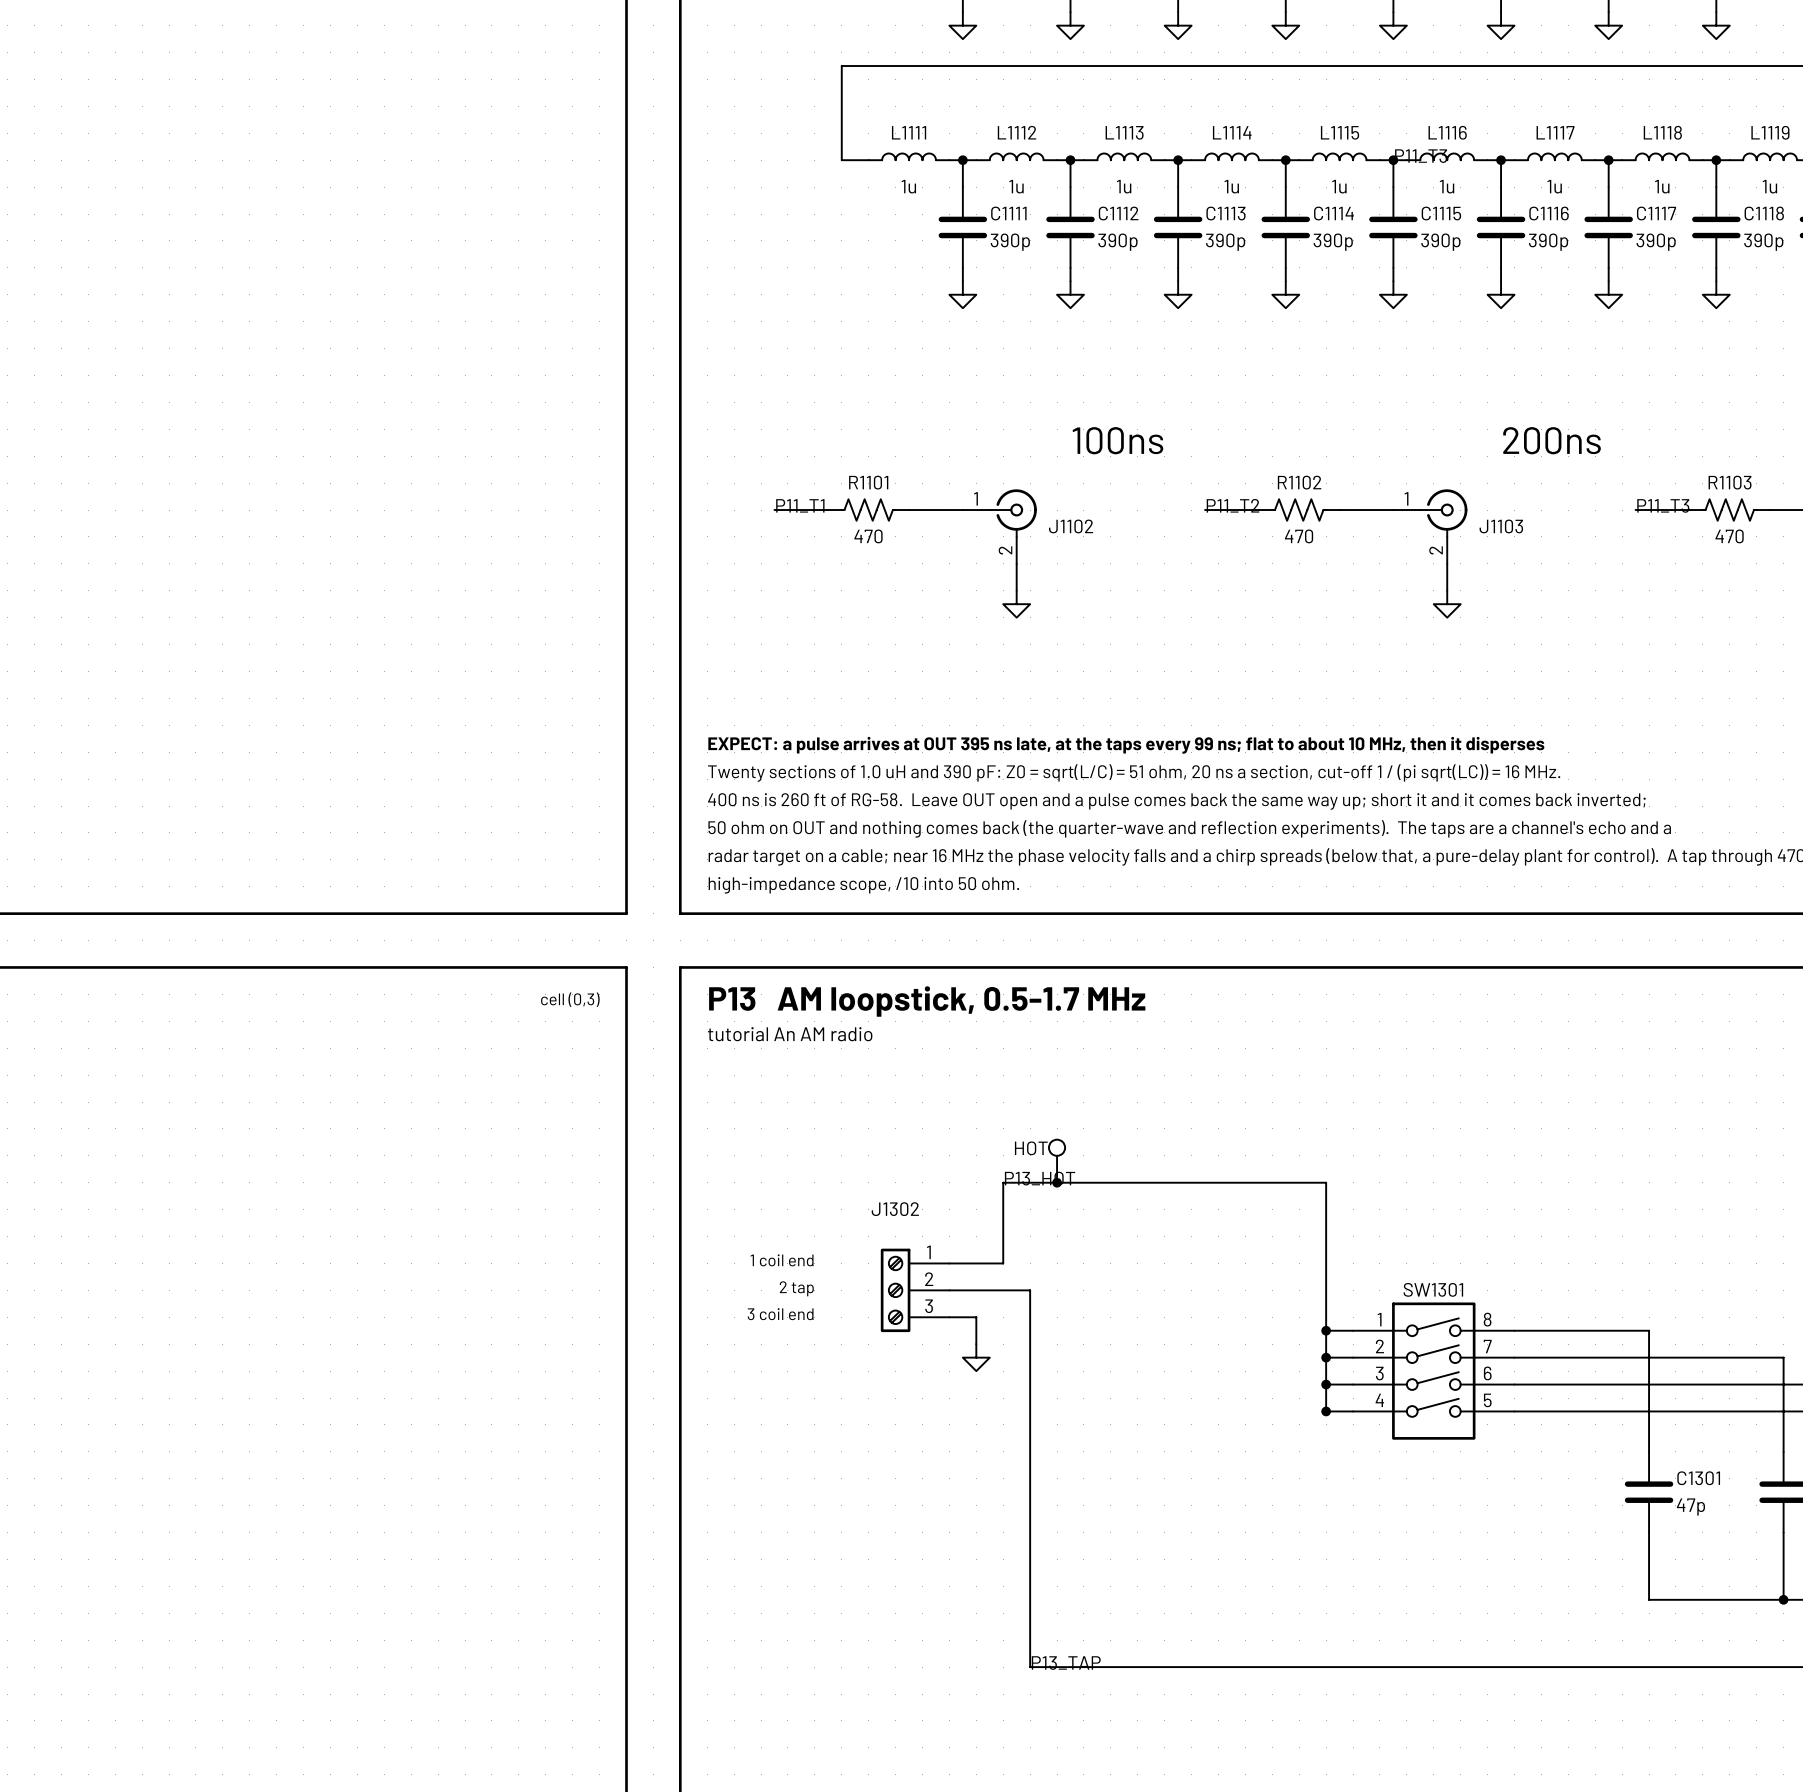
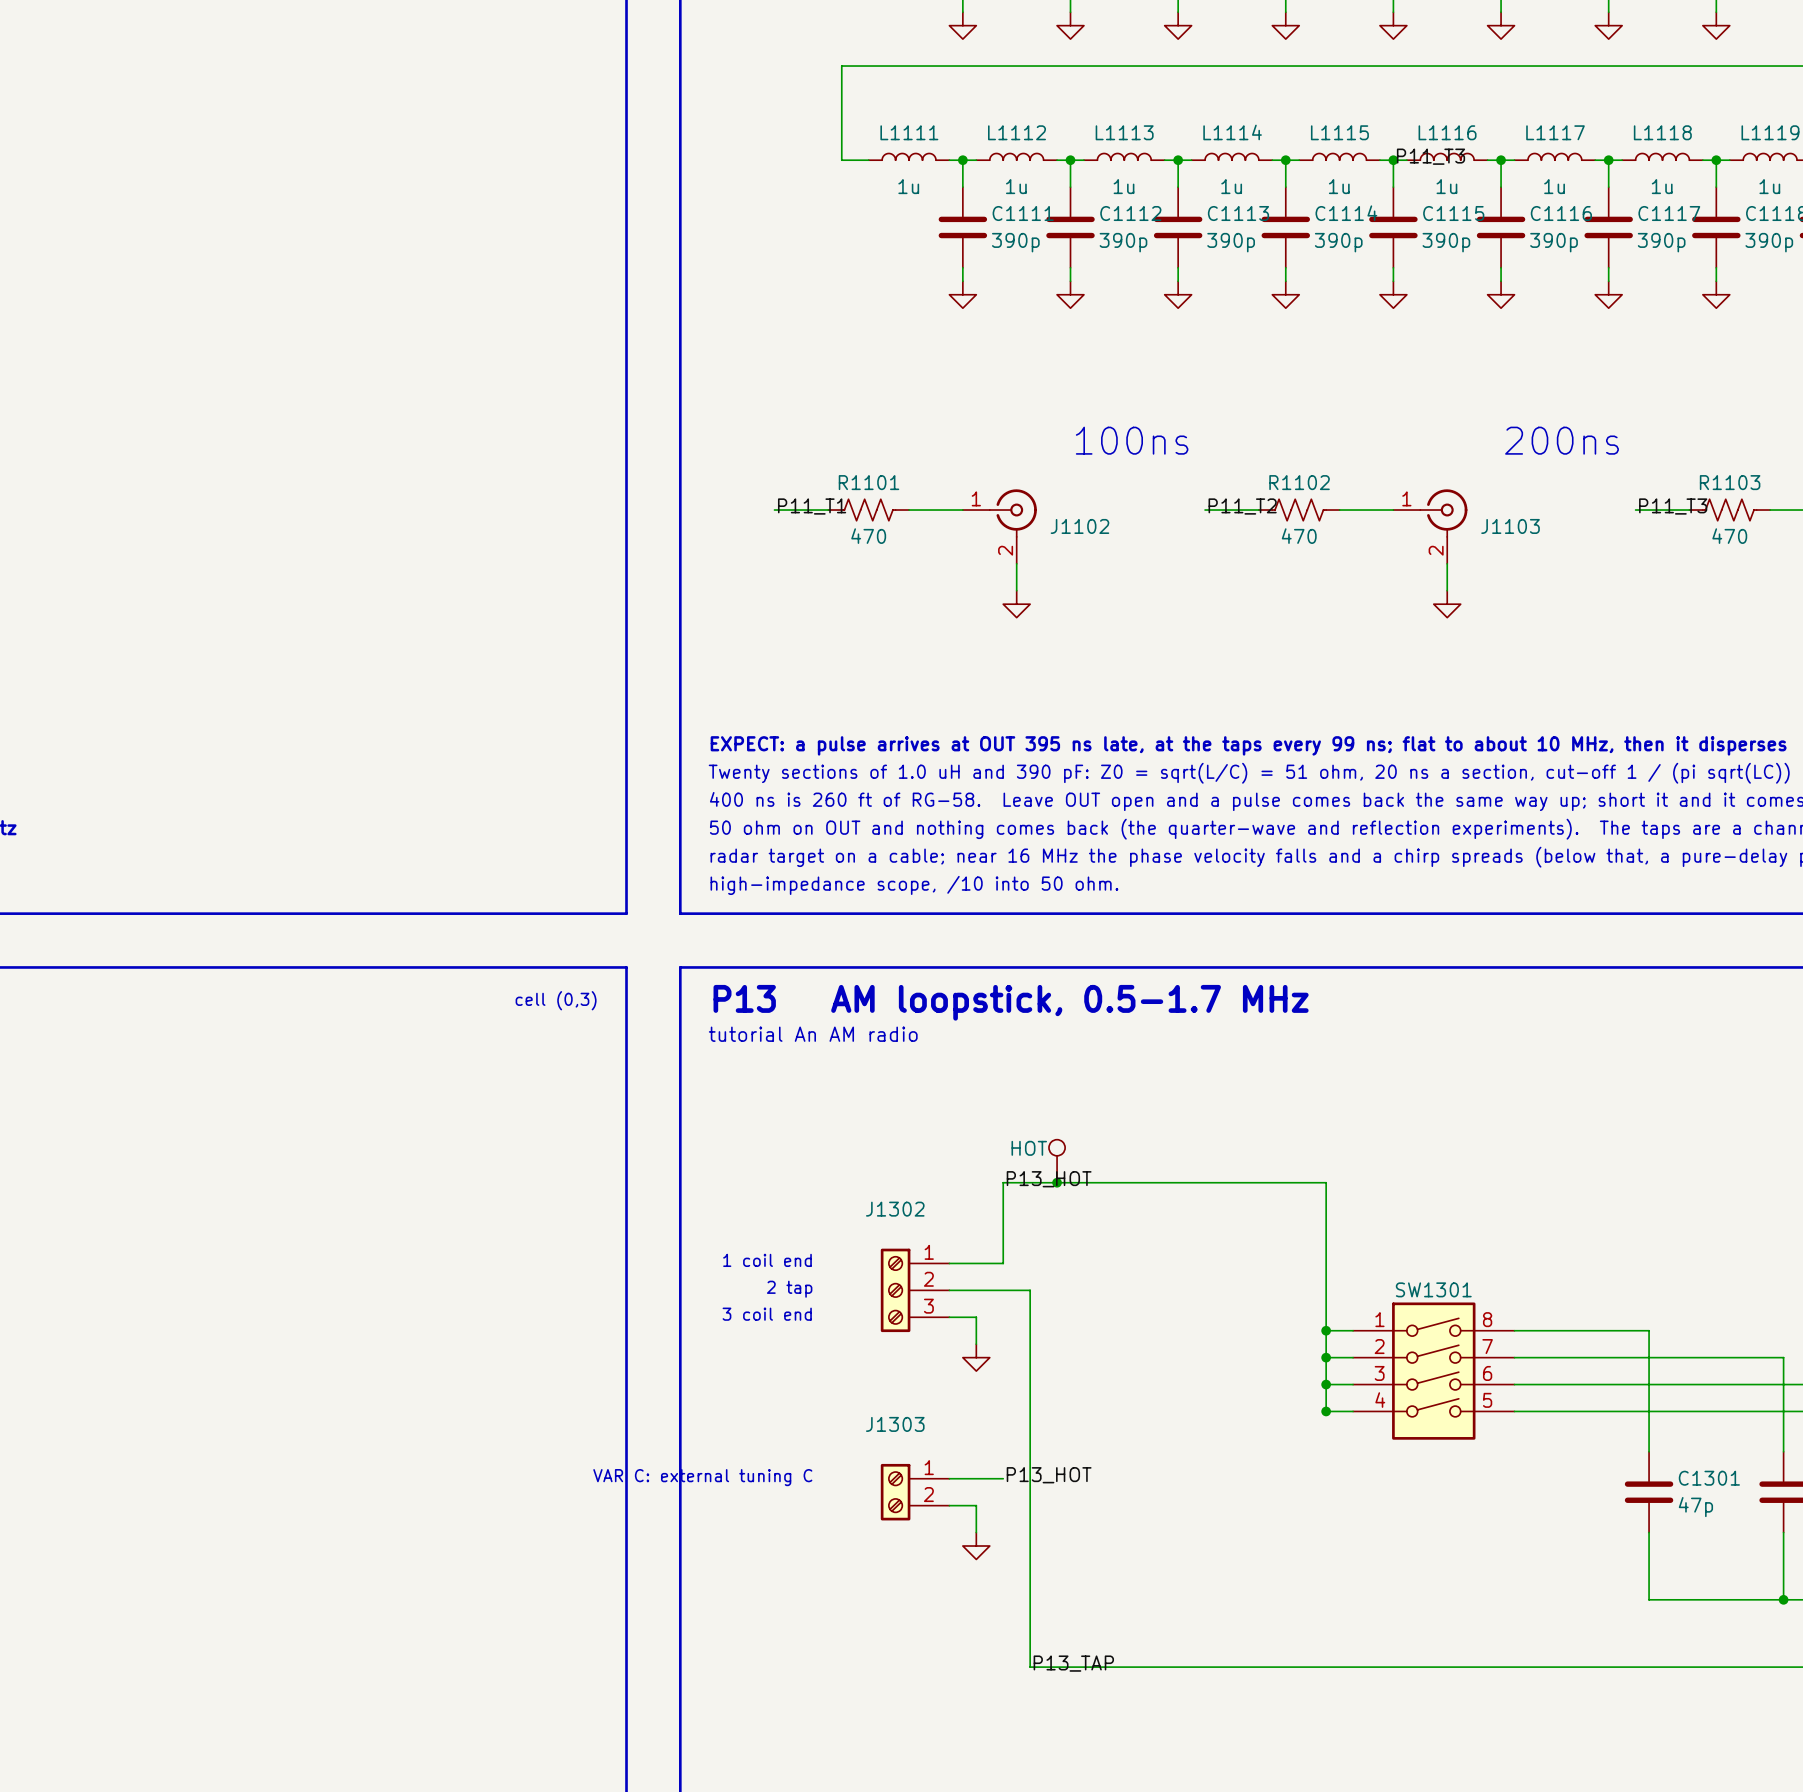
label: none -> P13_HOT (1049, 1475)
text: none -> VAR C: external tuning C (702, 1477)
wire: none -> (949, 1478) (1003, 1478)
J1303: none -> (915, 1492)
wire: none -> (949, 1505) (976, 1505) (976, 1532)
power symbol: none -> (976, 1546)

